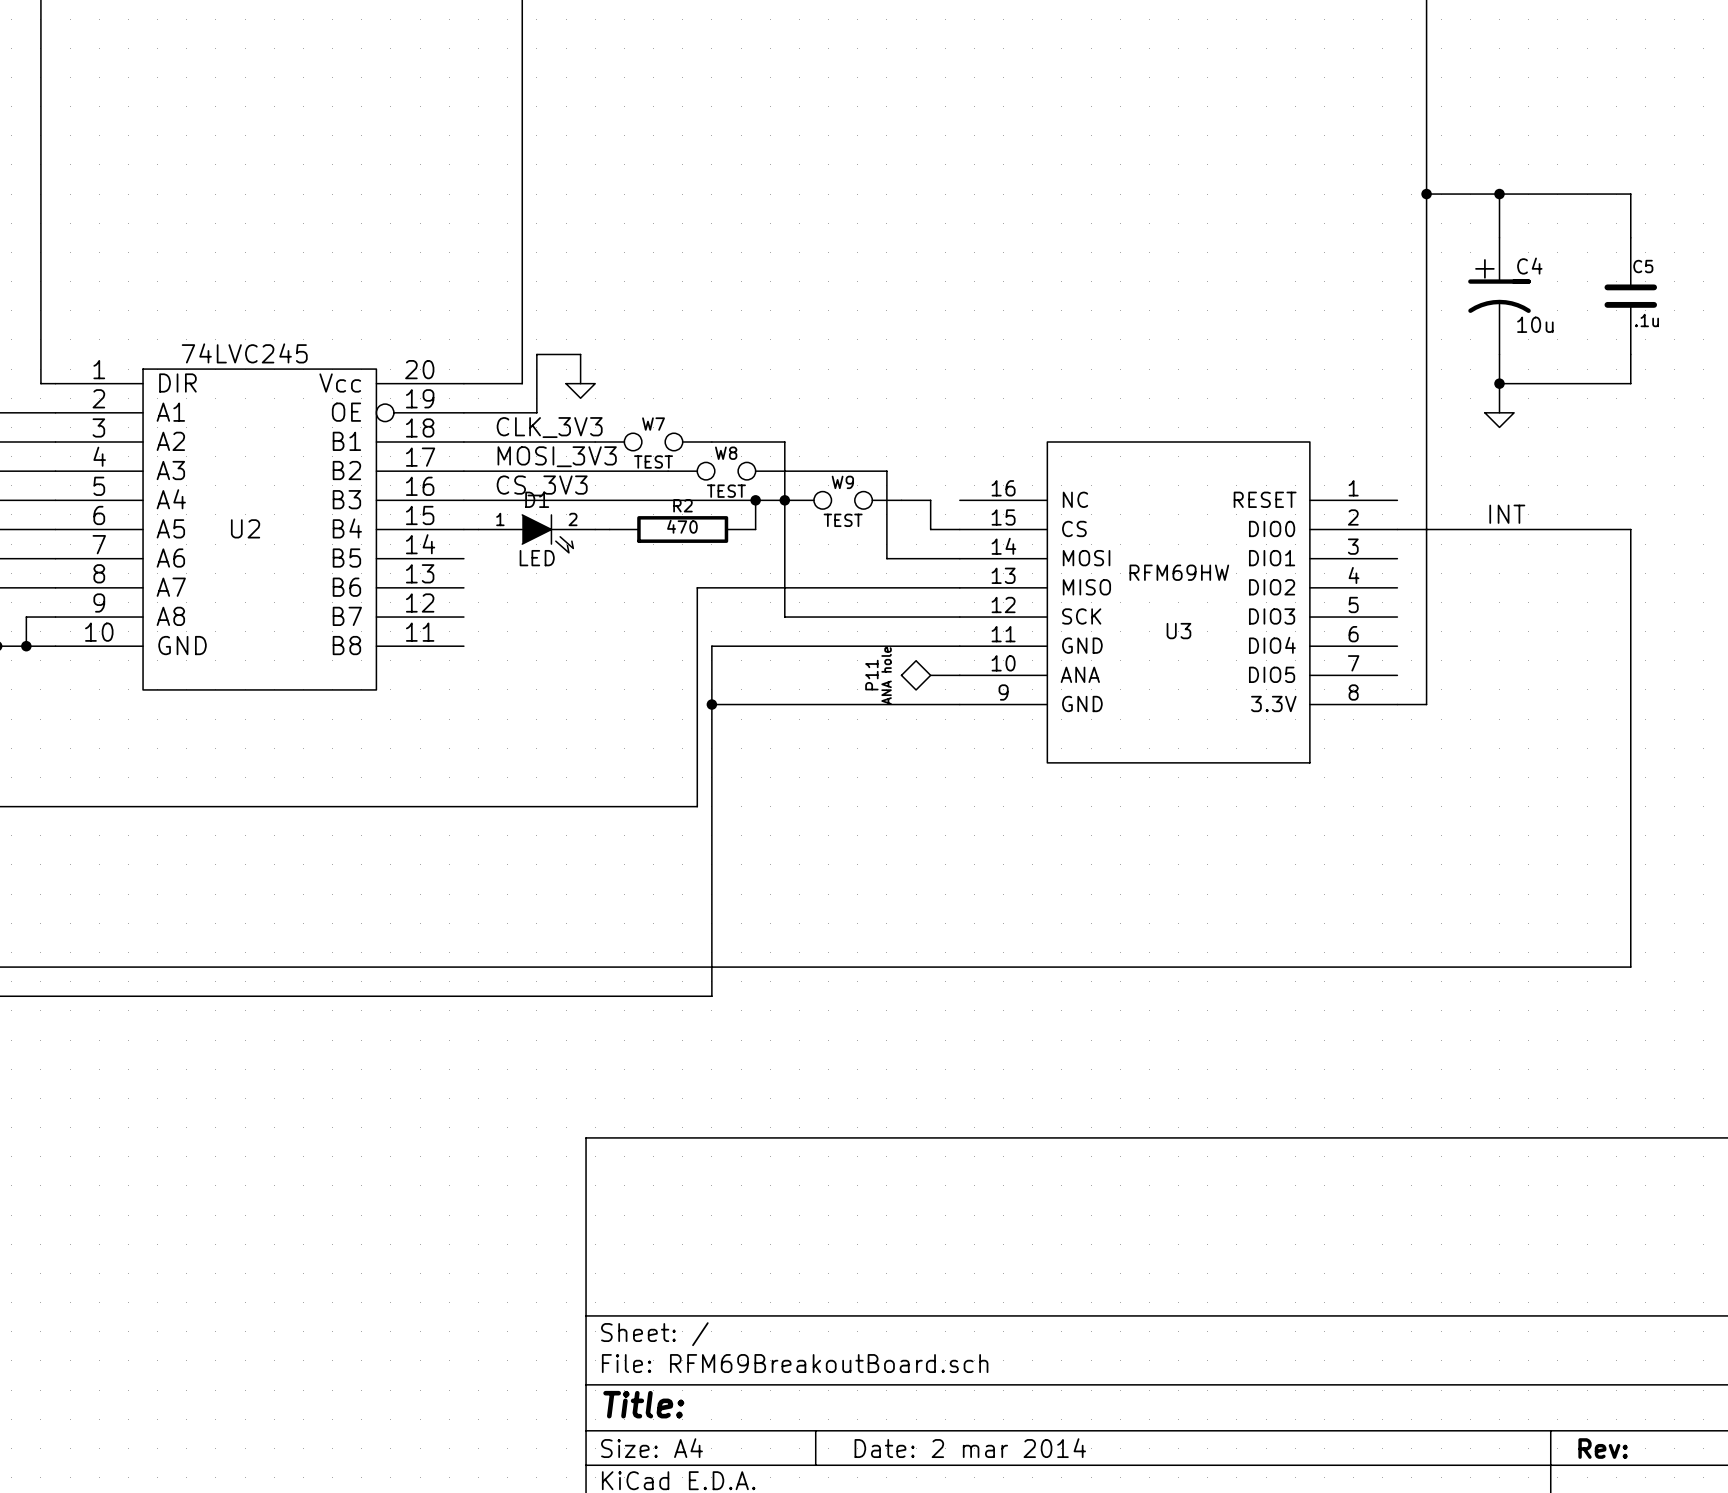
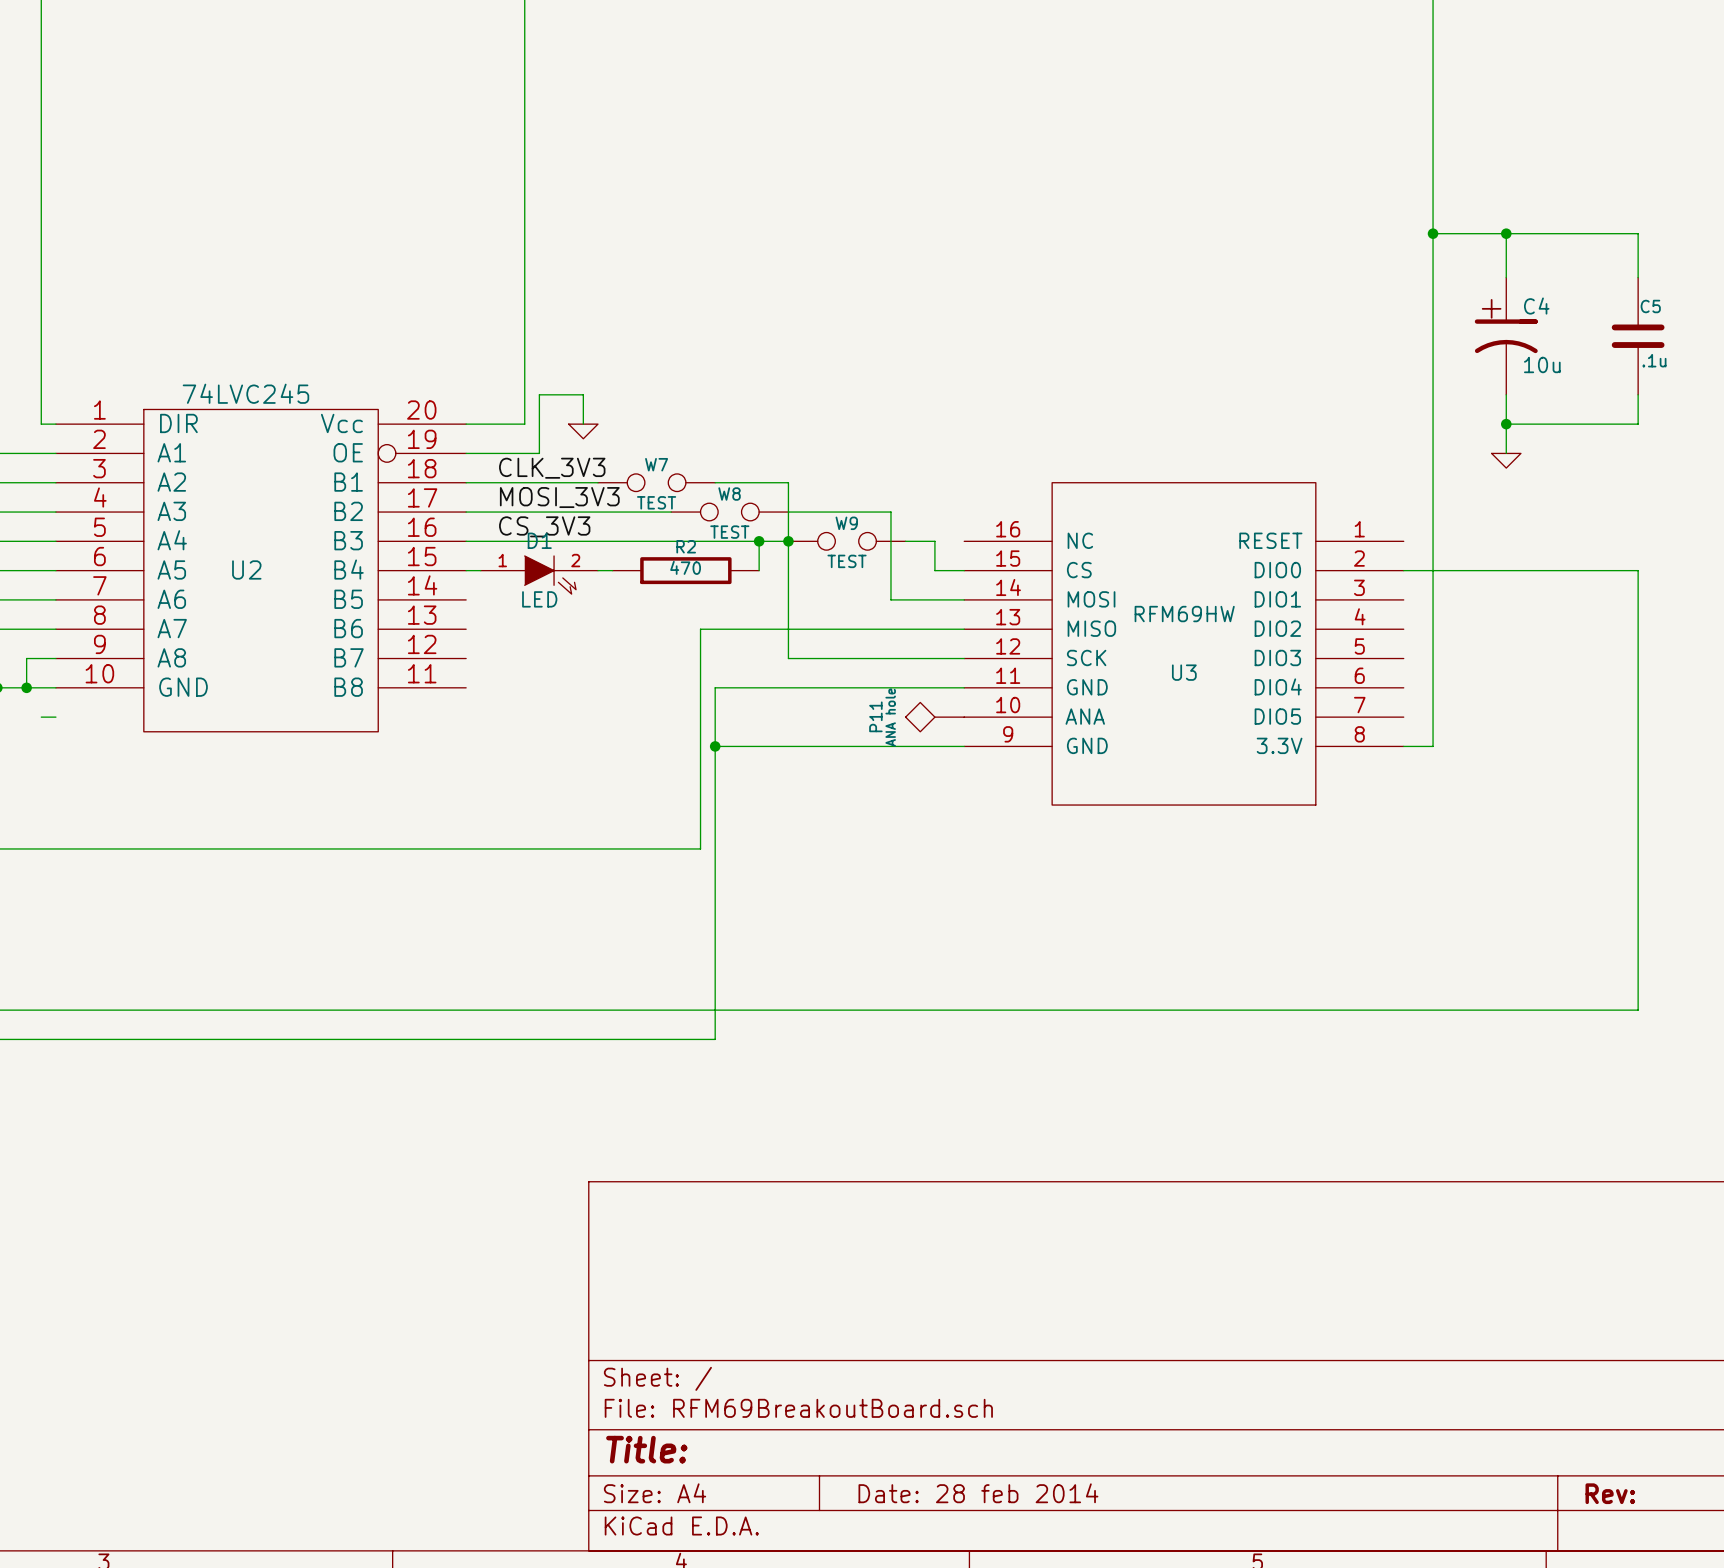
label: INT (1507, 514) -> none
wire: none -> (41, 717) (55, 717)
title block: Date: 2 mar 2014 (970, 1448) -> Date: 28 feb 2014 (978, 1493)

